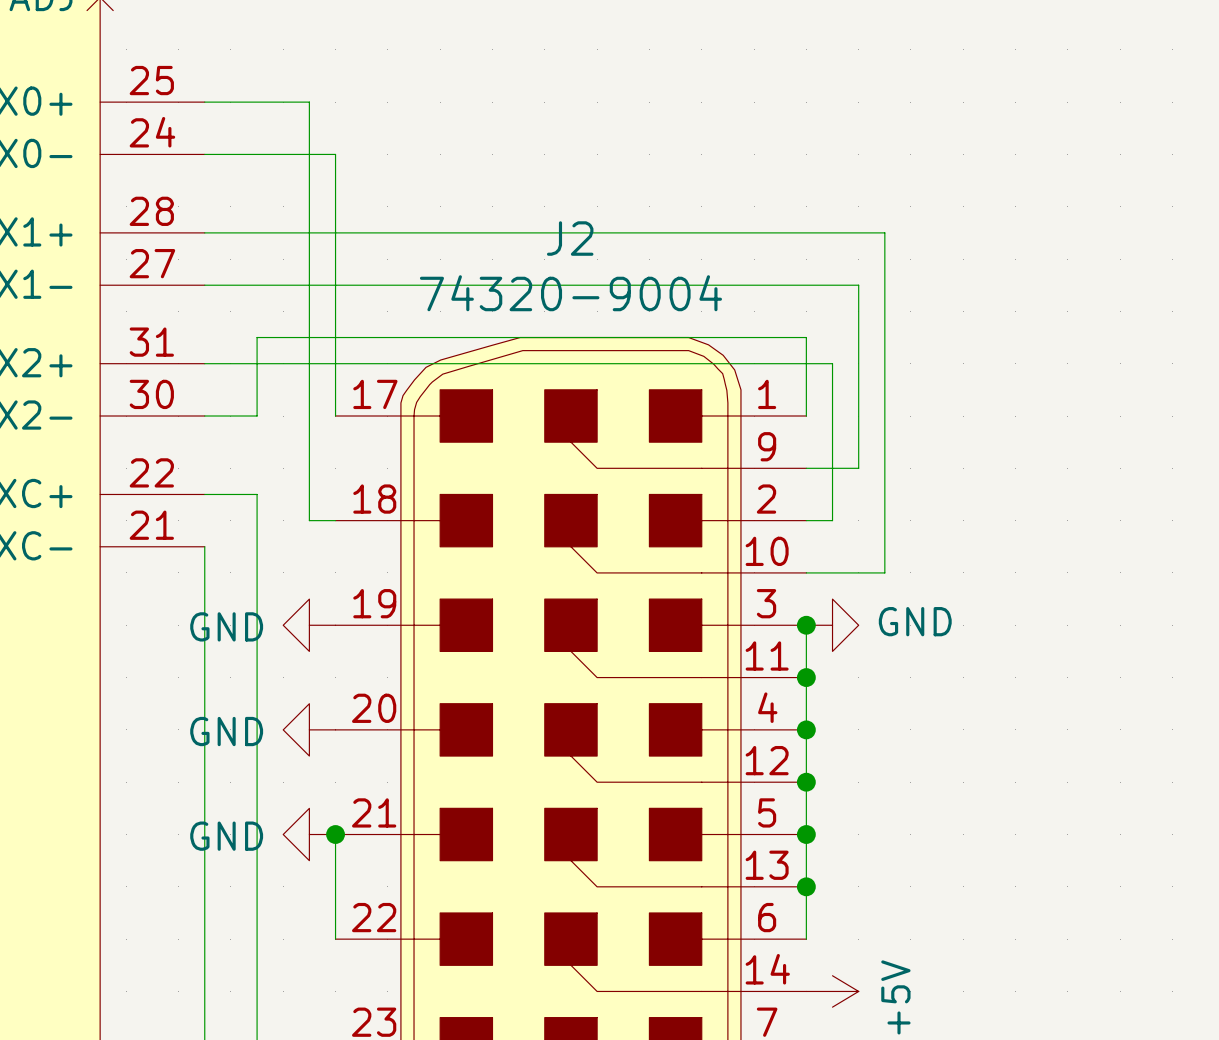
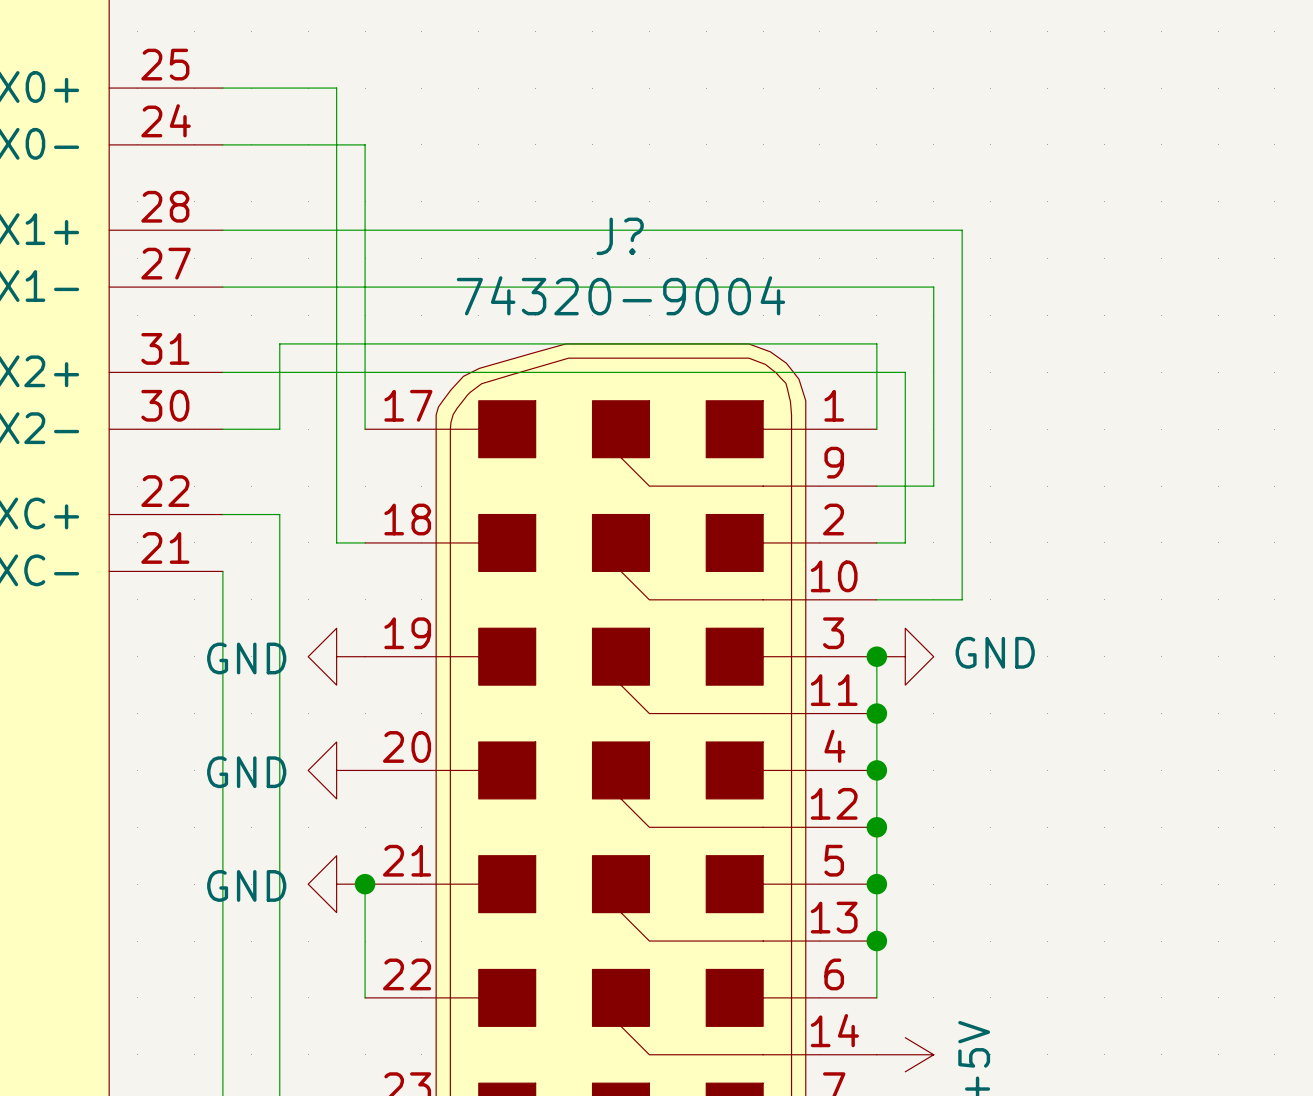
J2 name: J2 (570, 238) -> J? (620, 236)

